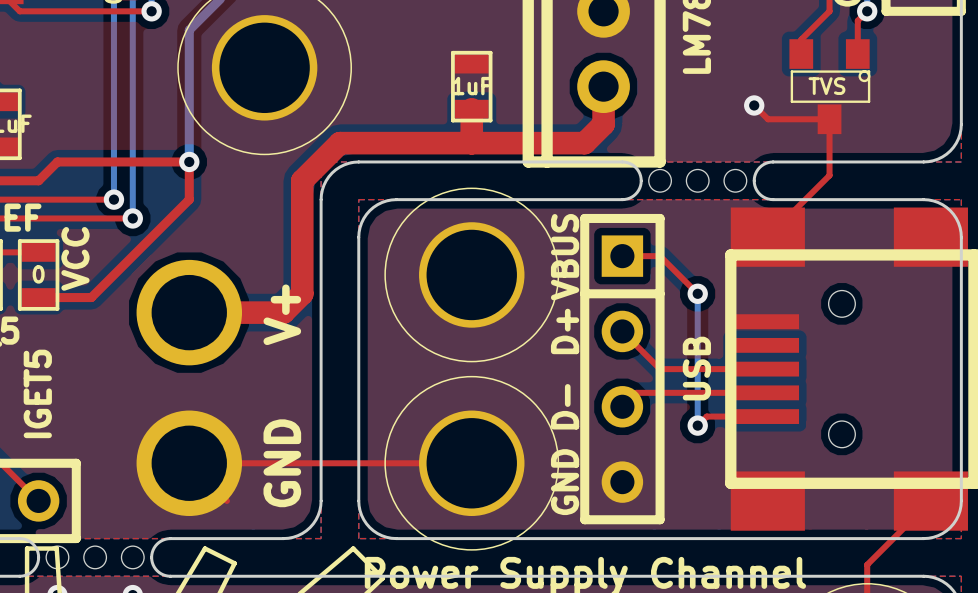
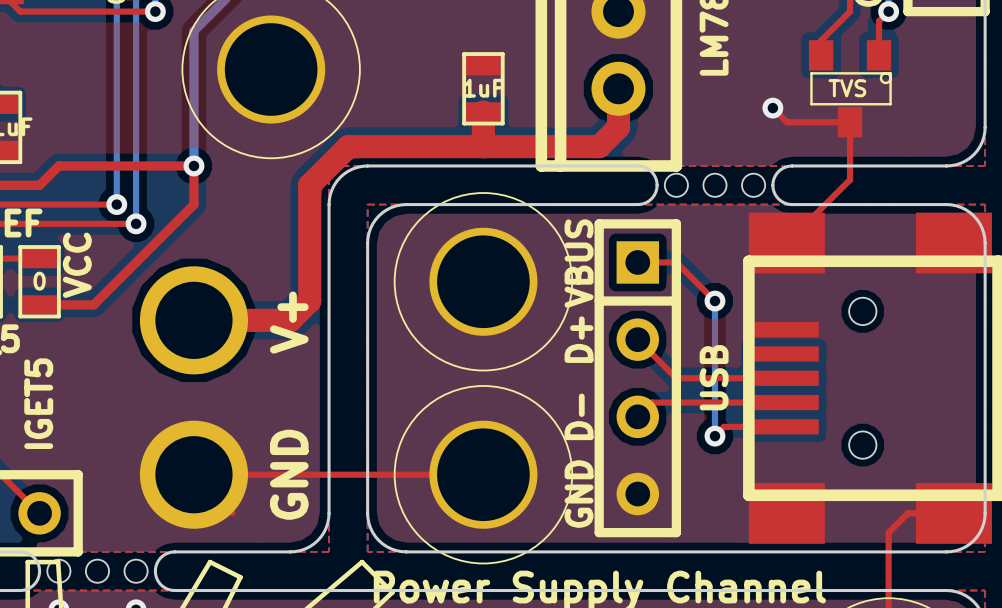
top track: (930, 501) (867, 564) -> (953, 513) (907, 513) (888, 532) (888, 578)

